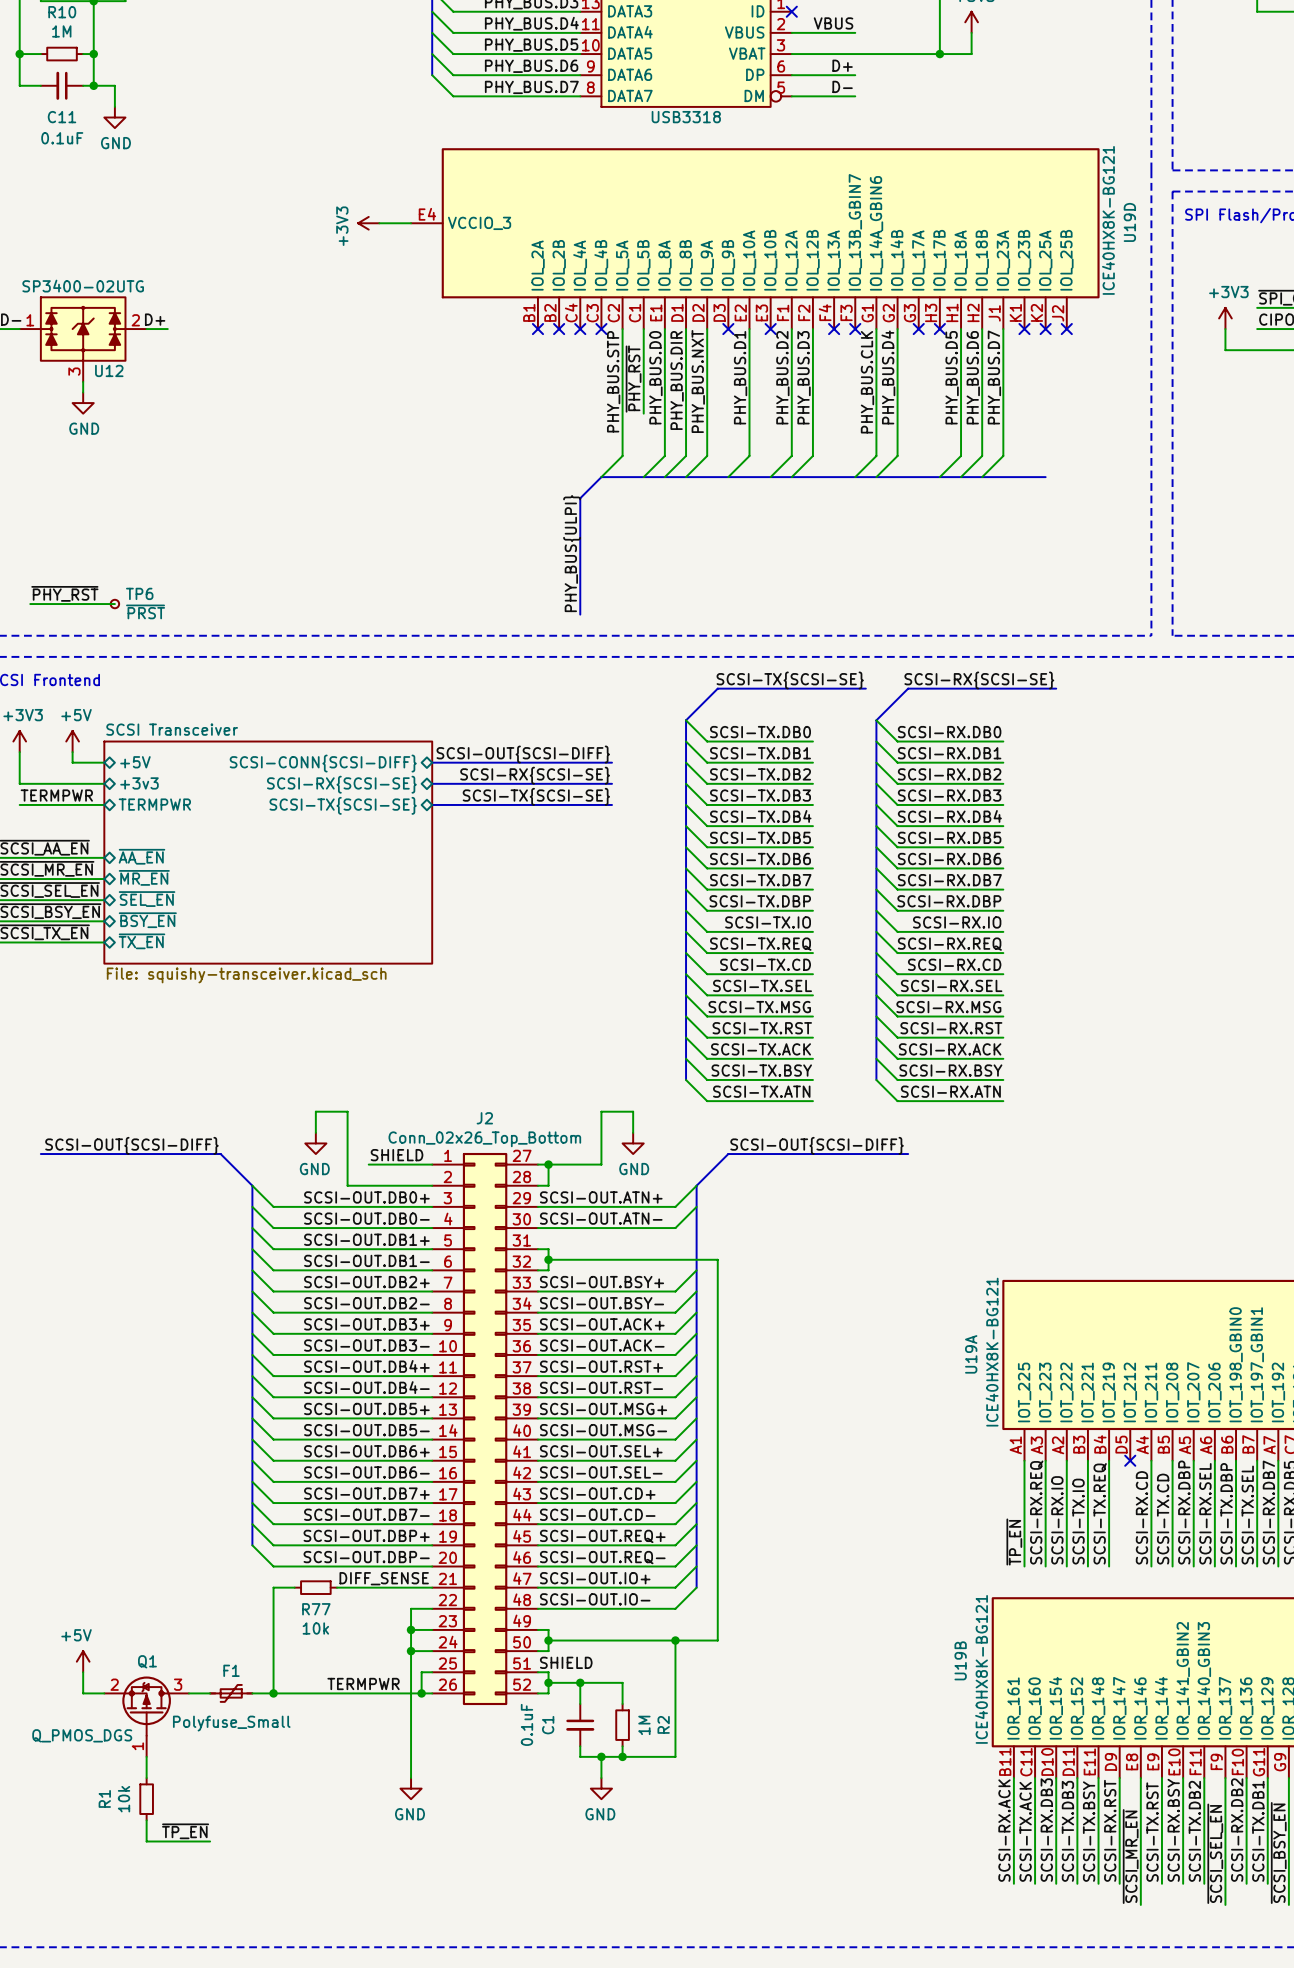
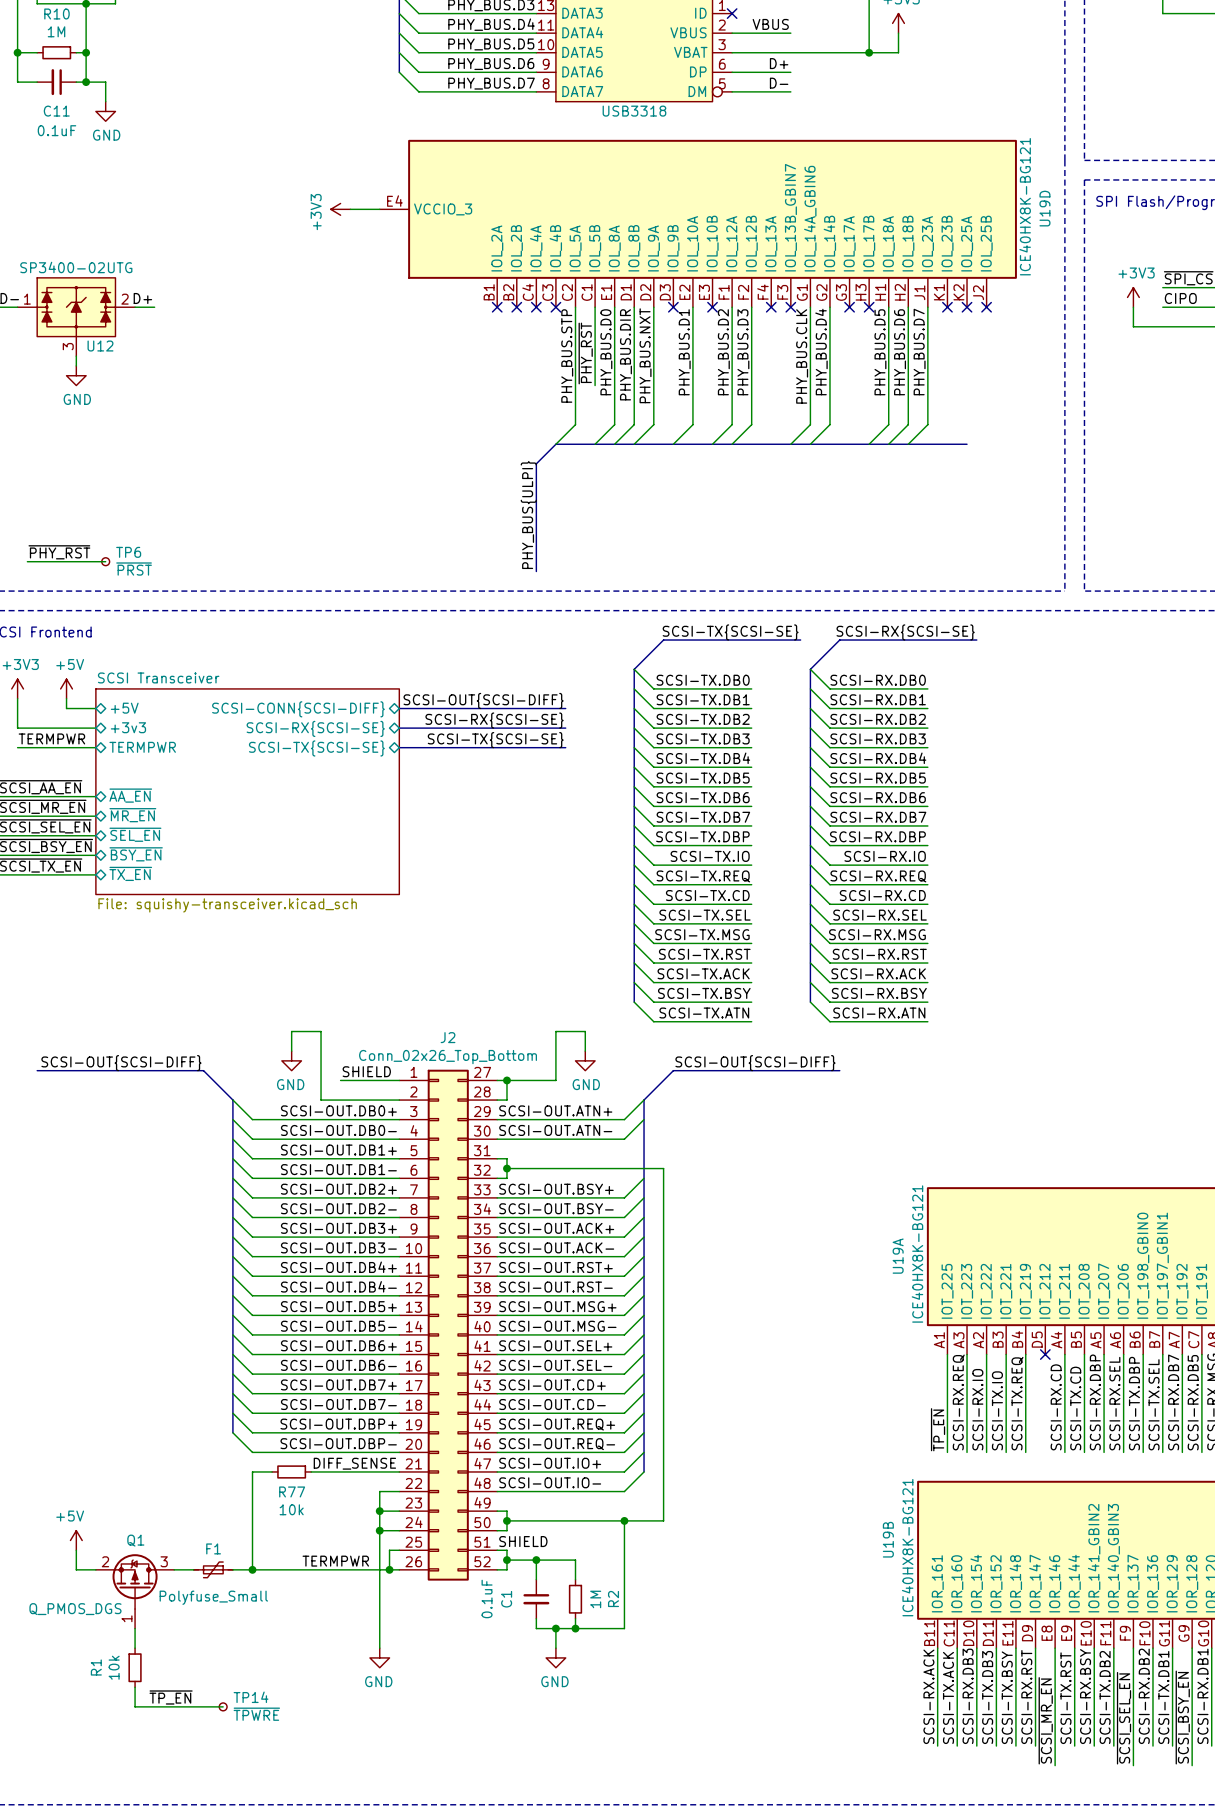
wire: none -> (193, 1706) (223, 1706)
TP14: none -> ~{TPWRE} (223, 1706)

